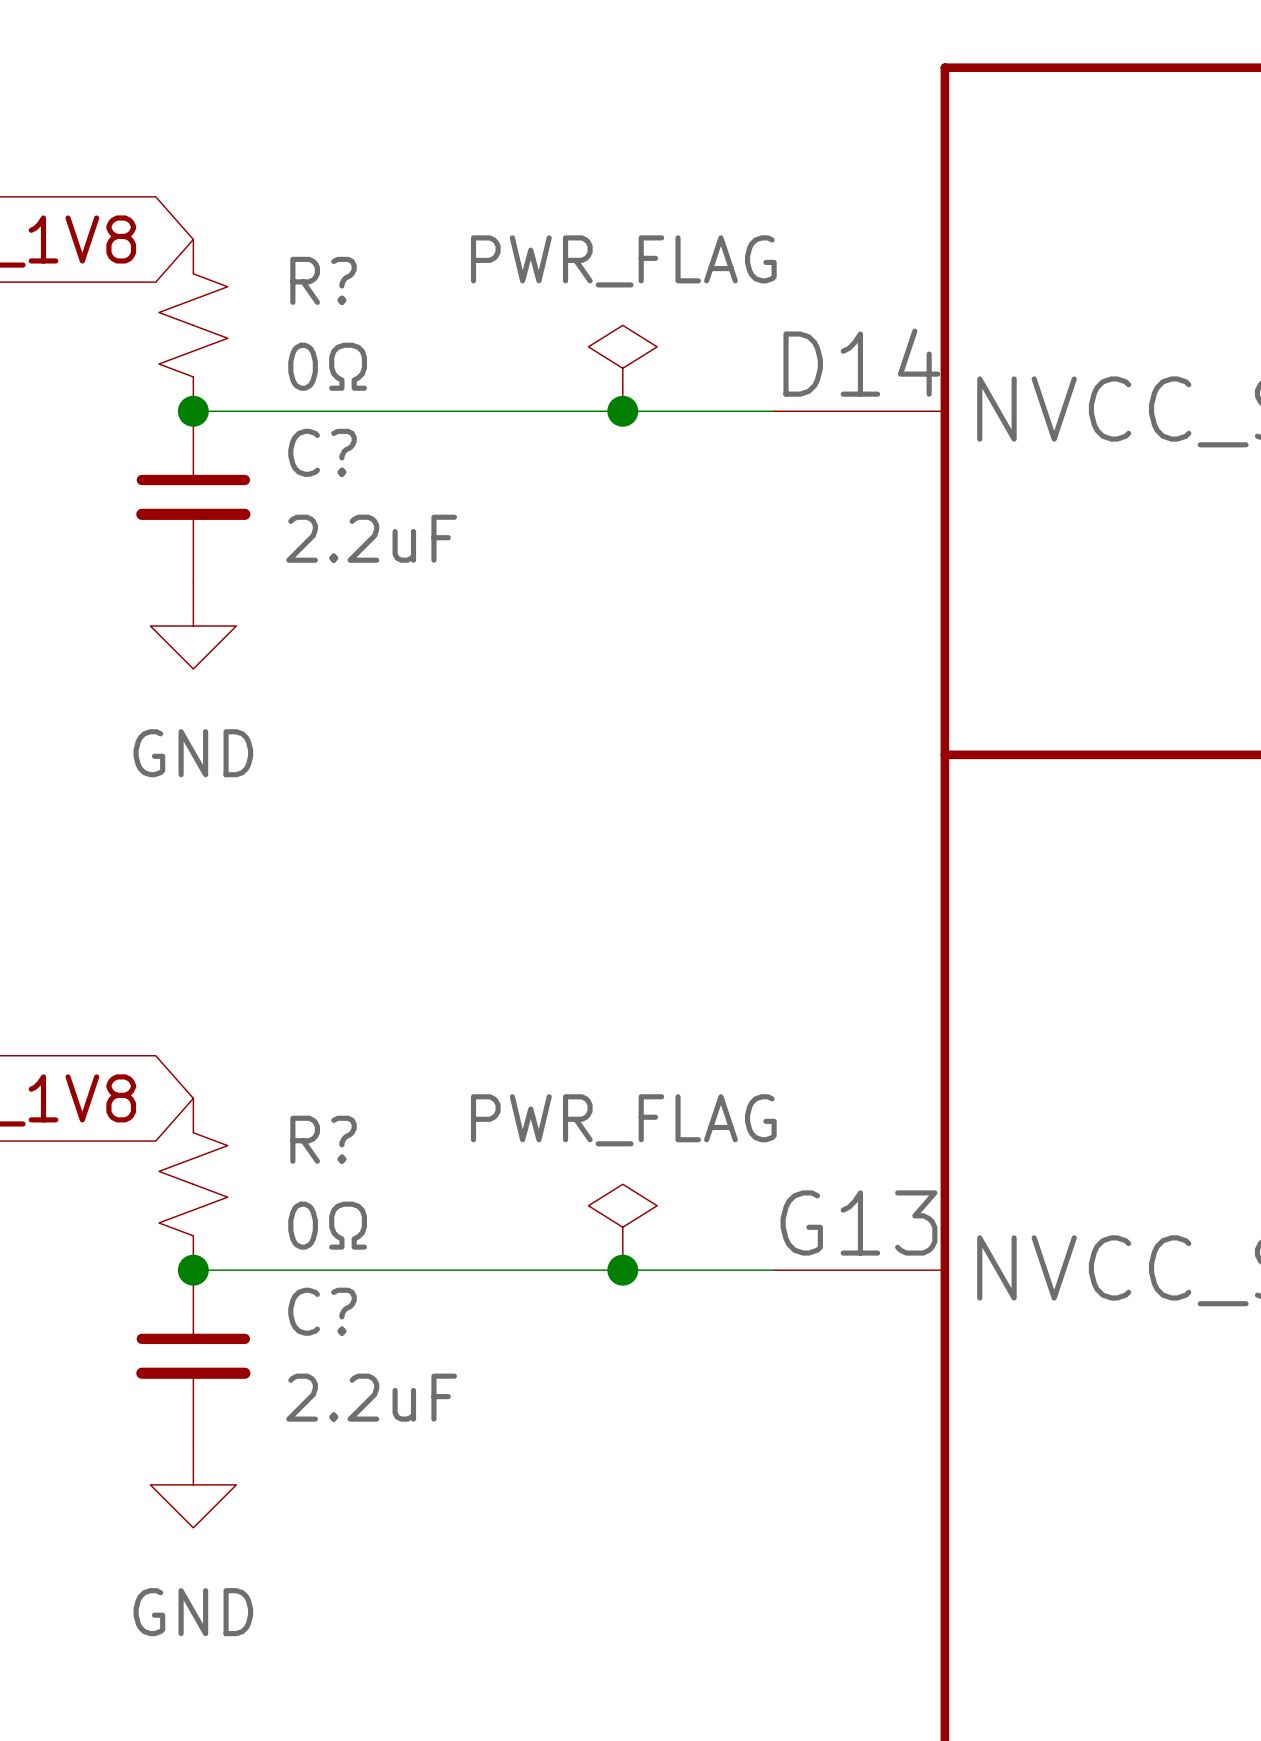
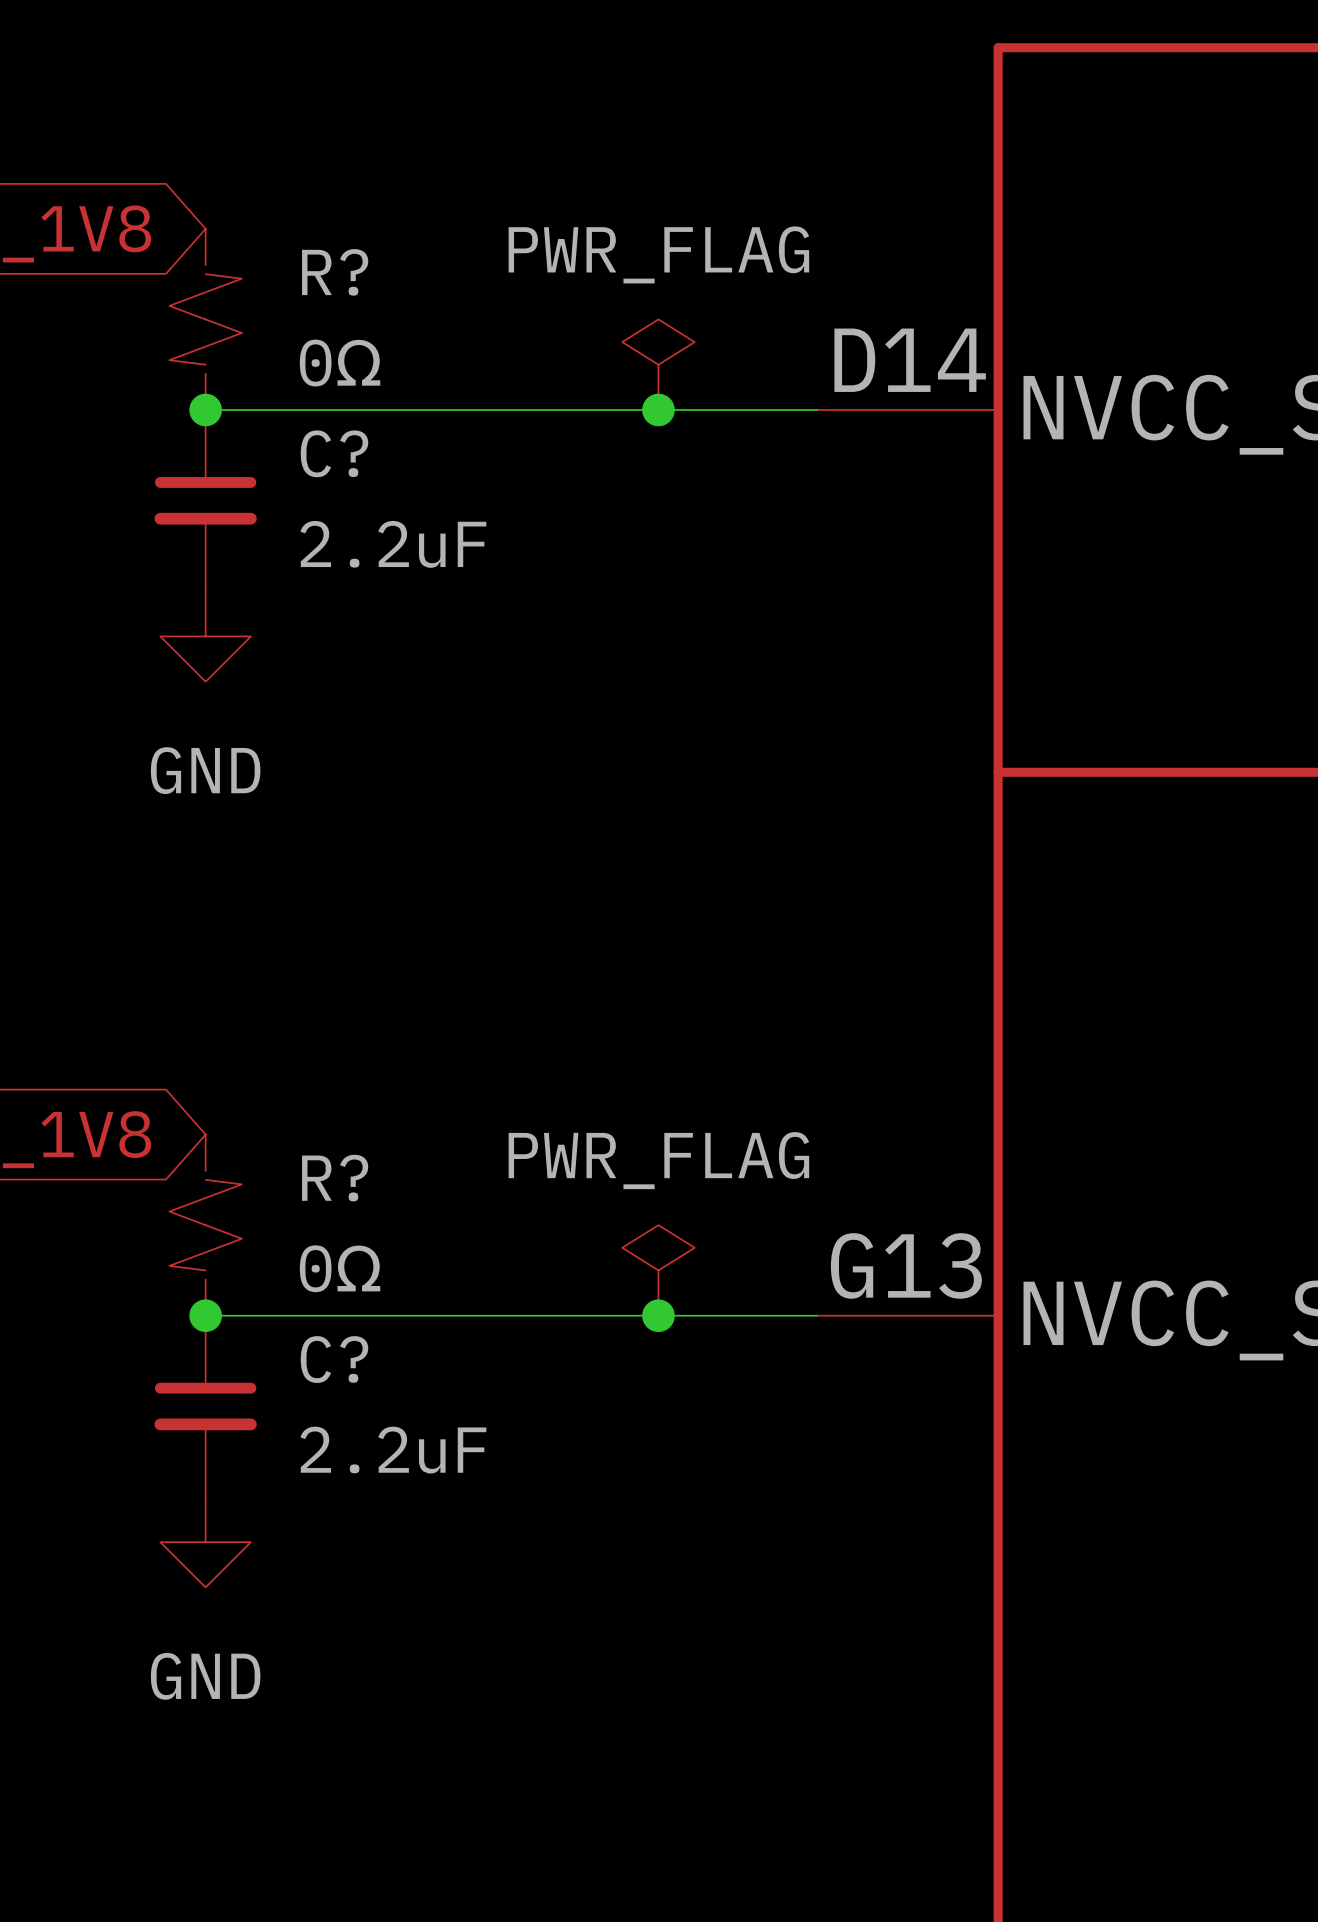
R? symbol: [159, 239, 228, 412] -> [169, 228, 242, 411]
C? symbol: [136, 411, 251, 584] -> [154, 410, 257, 592]
R? symbol: [159, 1098, 228, 1271] -> [169, 1134, 242, 1316]
C? symbol: [136, 1270, 251, 1442] -> [154, 1315, 257, 1497]

